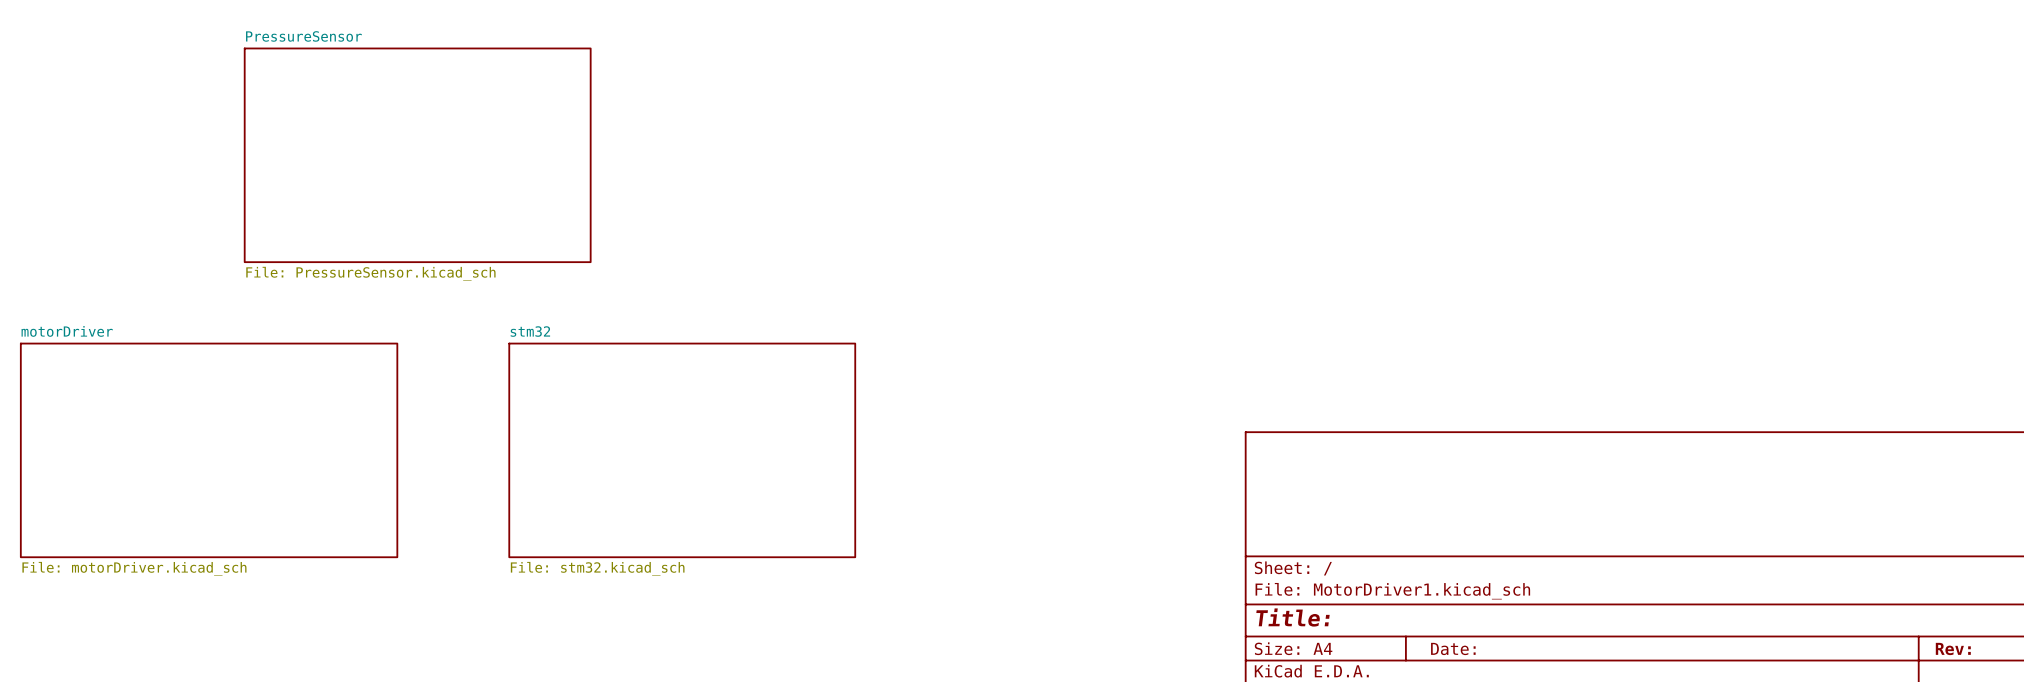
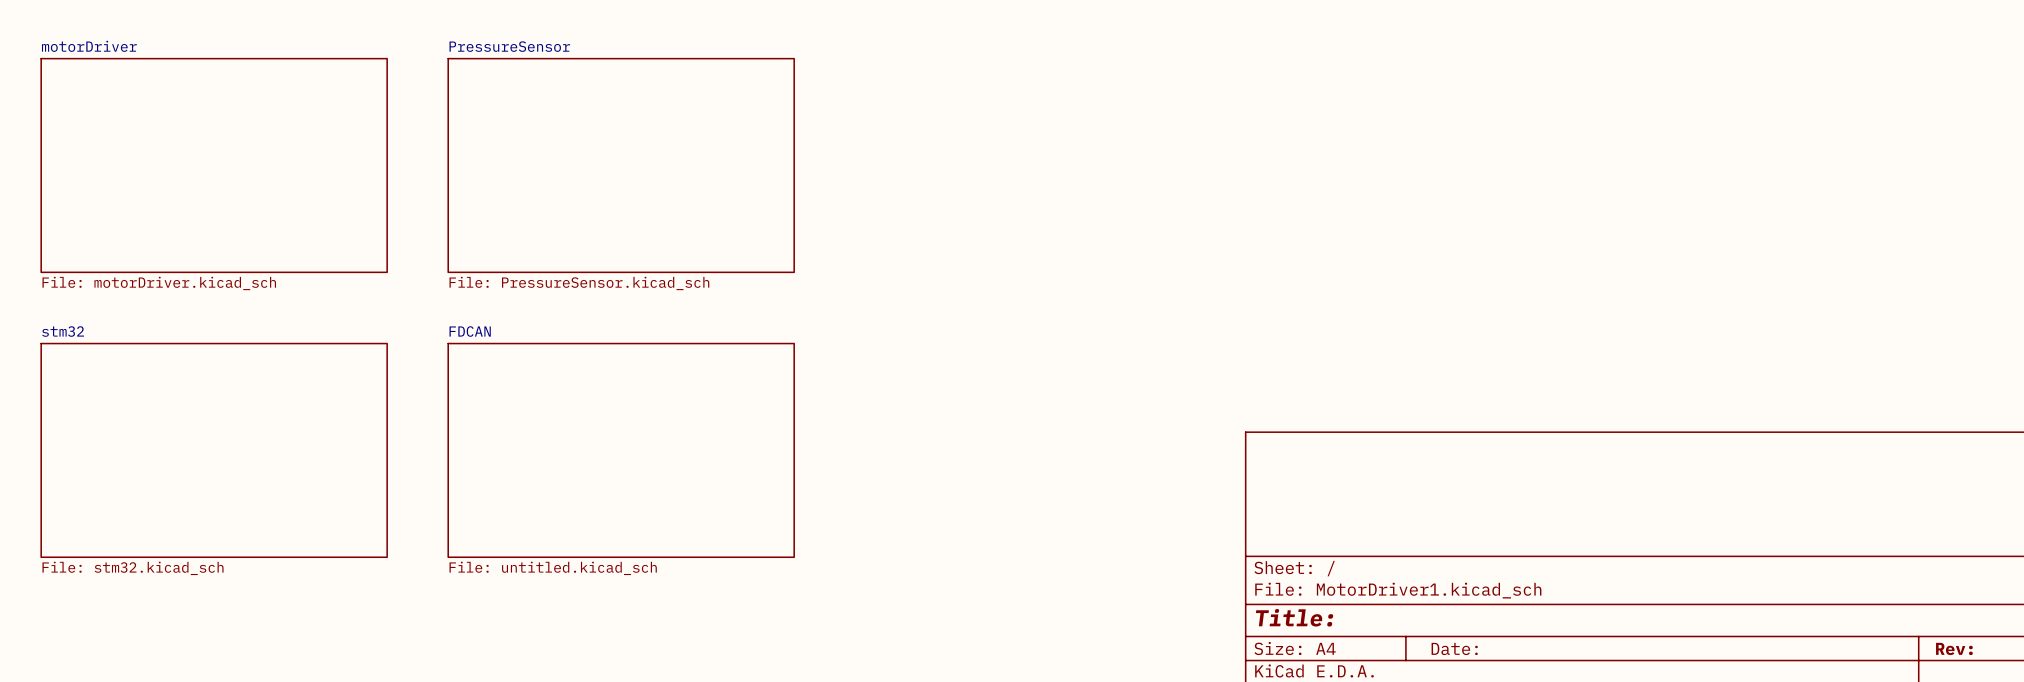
sheet PressureSensor: File: PressureSensor.kicad_sch (417, 155) -> none
sheet motorDriver: none -> File: motorDriver.kicad_sch (214, 165)
sheet PressureSensor: none -> File: PressureSensor.kicad_sch (621, 165)
sheet motorDriver: File: motorDriver.kicad_sch (209, 450) -> none
sheet FDCAN: none -> File: untitled.kicad_sch (621, 450)
sheet stm32 position: (682, 450) -> (214, 450)

